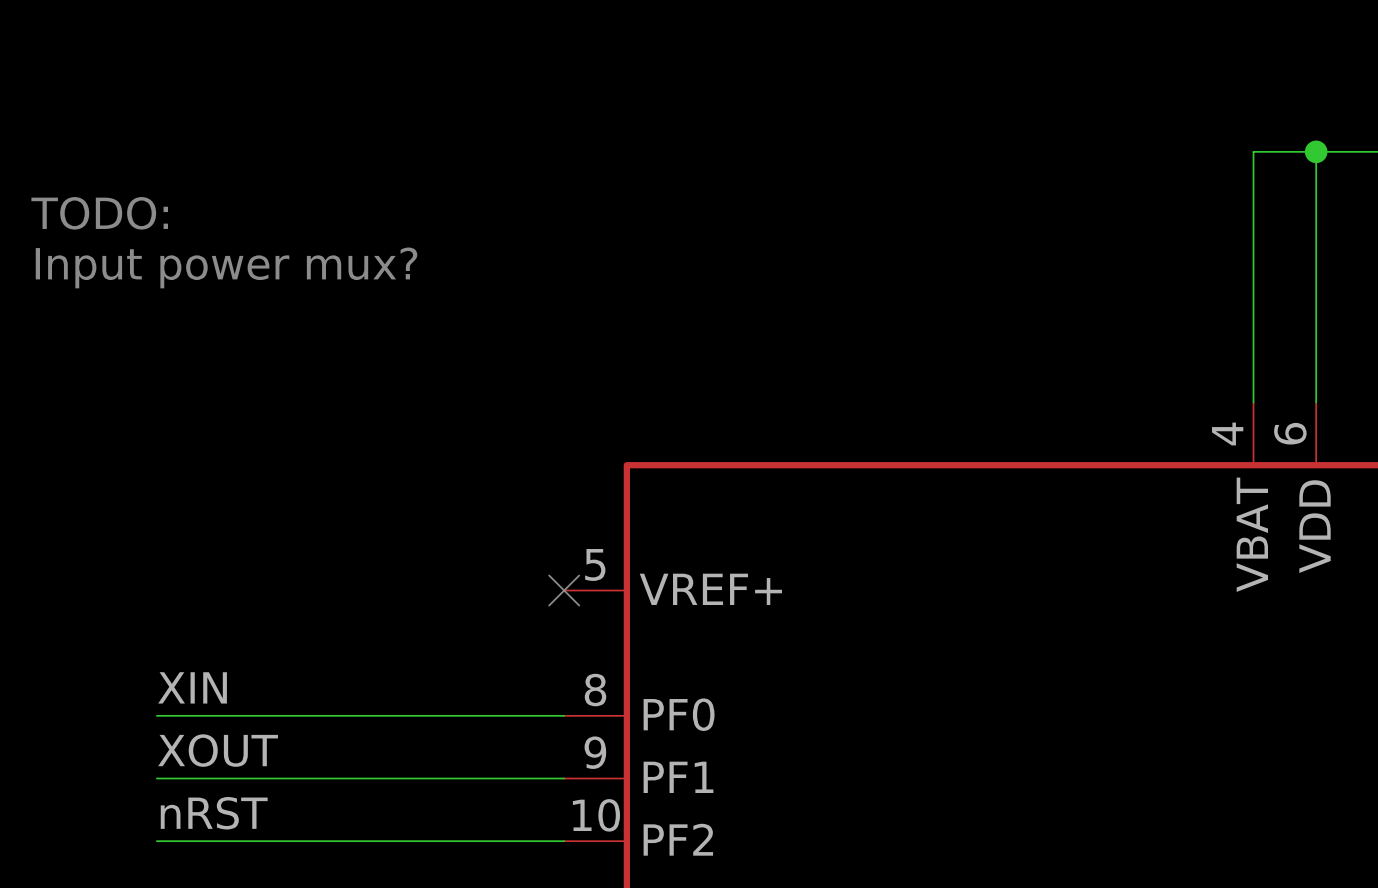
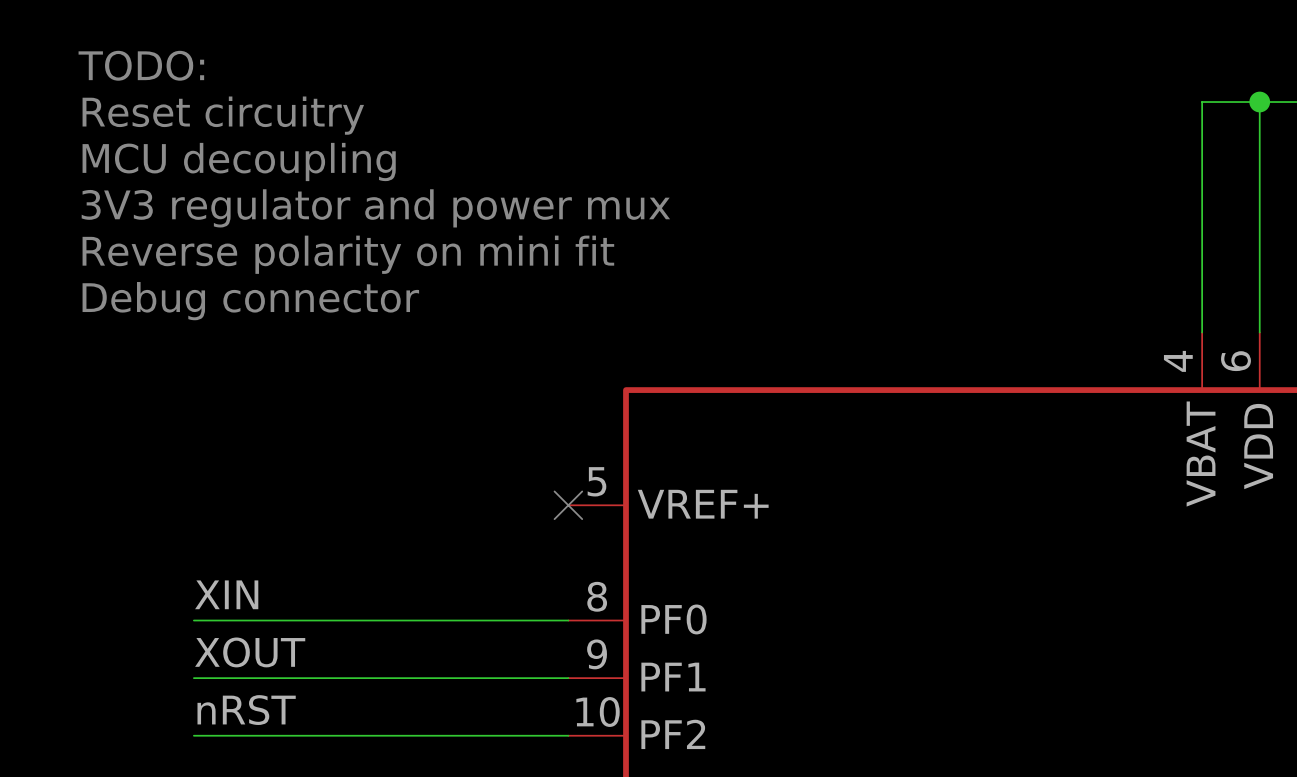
text: none -> TODO: (141, 65)
text: none -> Reset circuitry (223, 115)
text: TODO: (99, 213) -> MCU decoupling (239, 161)
text: Input power mux? (226, 267) -> 3V3 regulator and power mux (375, 208)
text: none -> Reverse polarity on mini fit (348, 254)
text: none -> Debug connector (250, 301)

